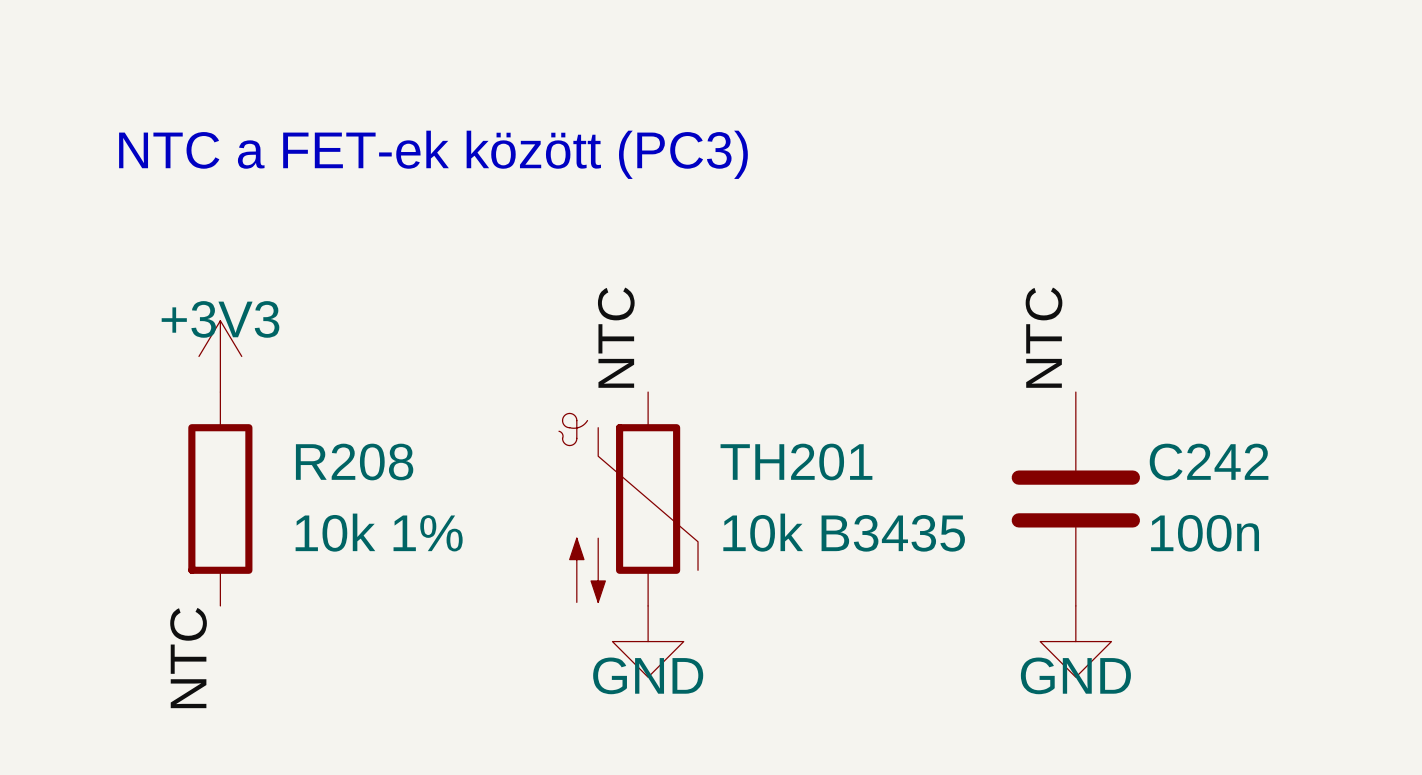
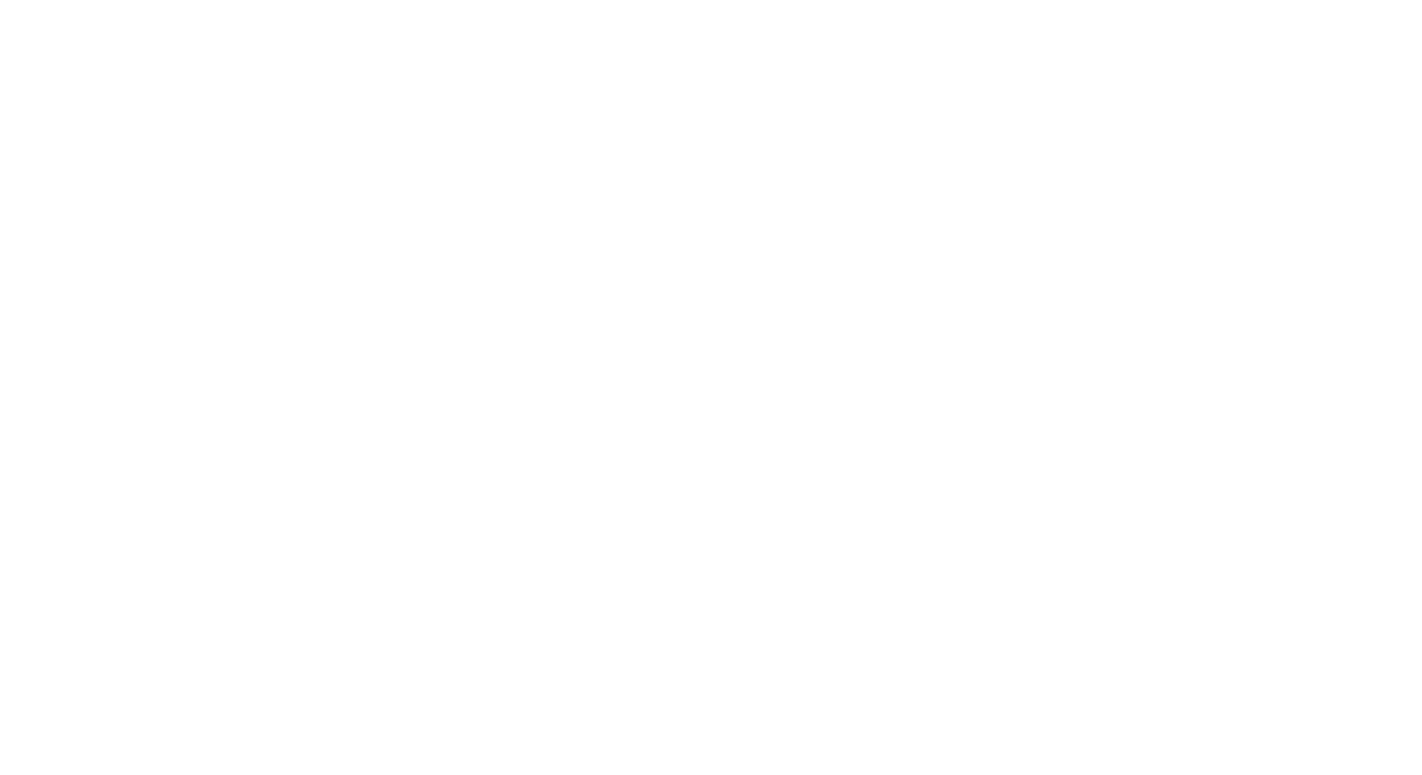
text: NTC a FET-ek között (PC3) (433, 154) -> none
label: NTC (616, 337) -> none
label: NTC (1044, 337) -> none
power symbol: +3V3 (220, 356) -> none
R208: 10k 1% (220, 499) -> none
TH201: 10k B3435 (628, 499) -> none
C242: 100n (1075, 499) -> none
power symbol: GND (648, 641) -> none
power symbol: GND (1075, 641) -> none
label: NTC (188, 658) -> none

